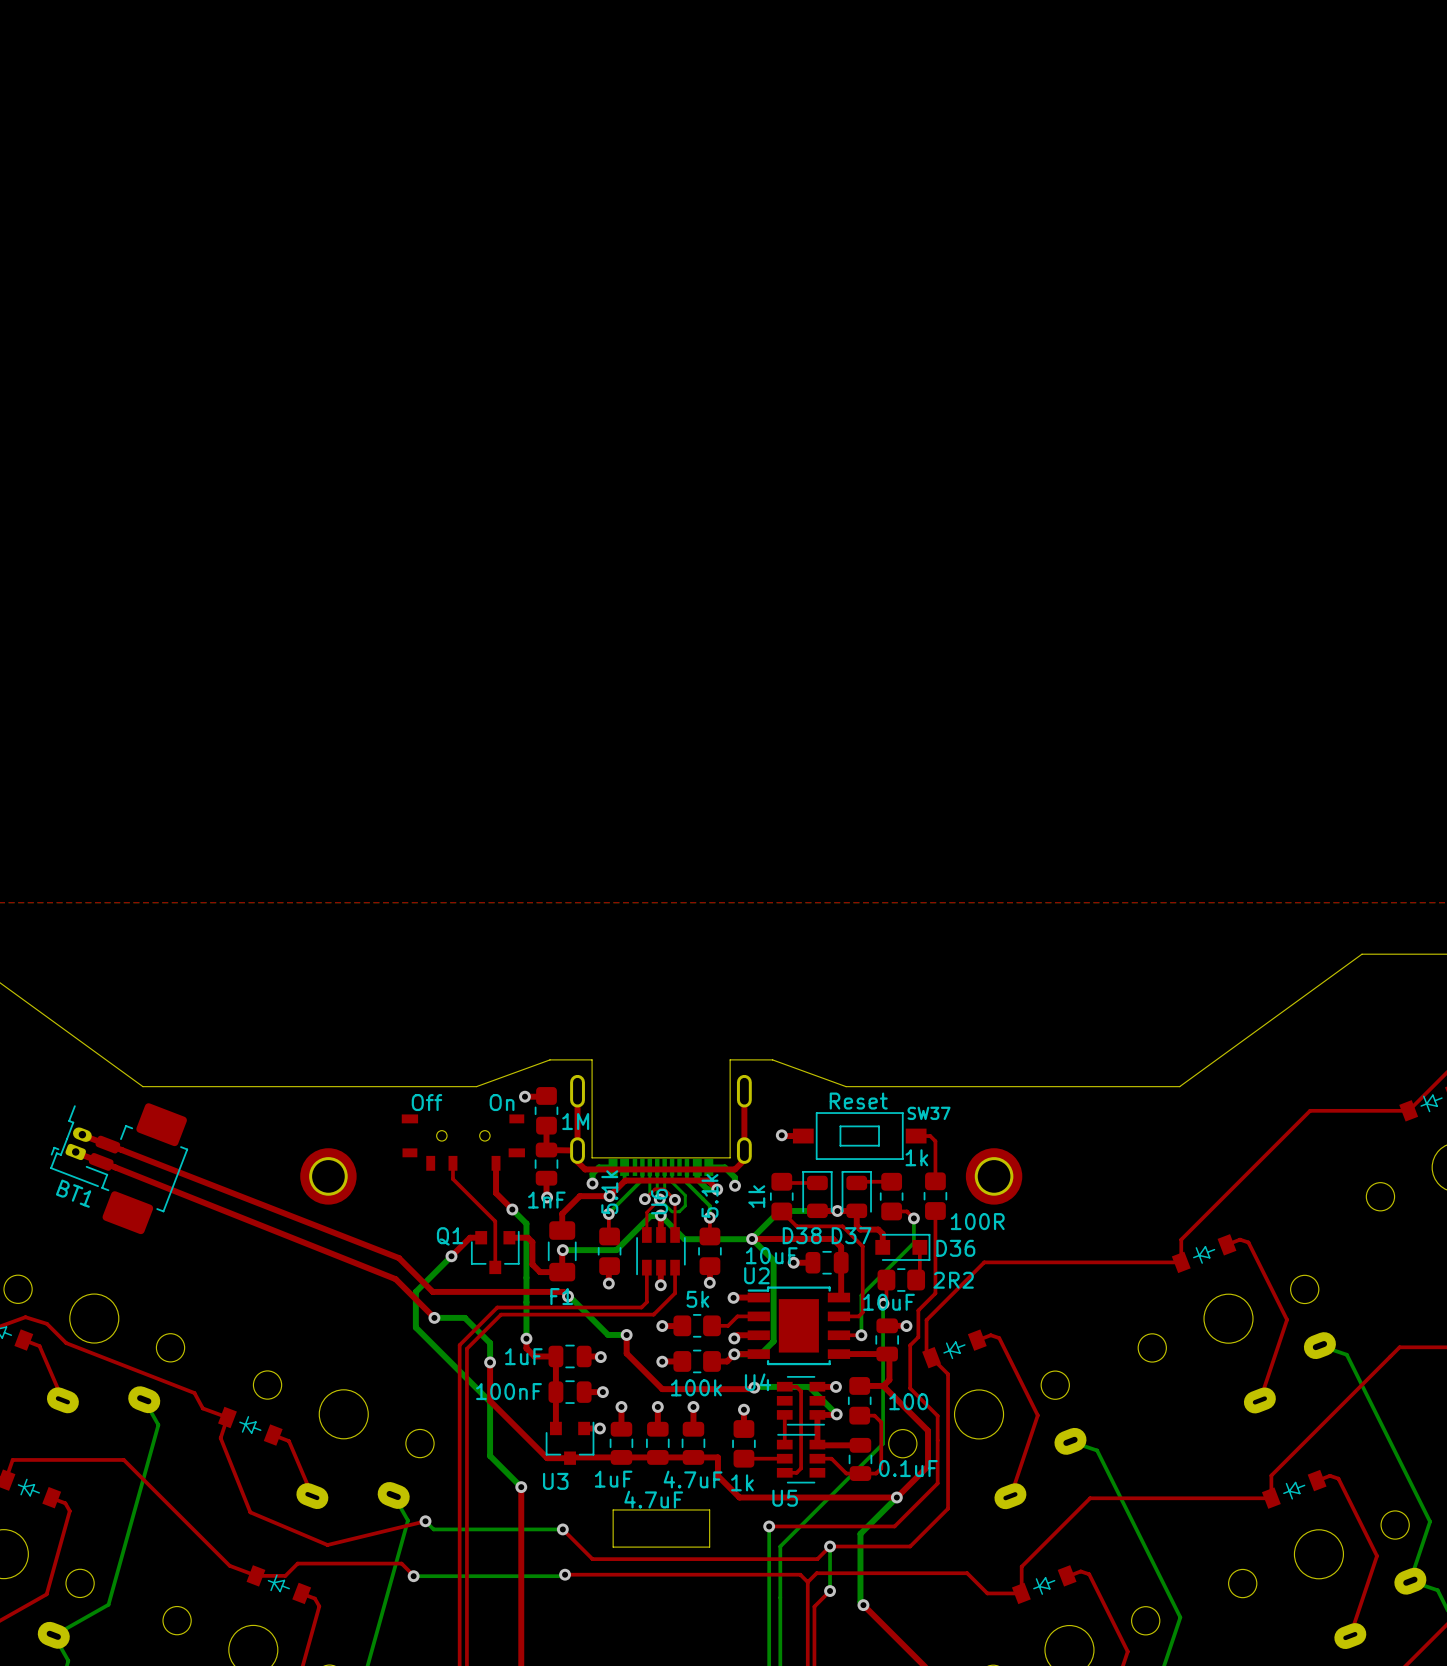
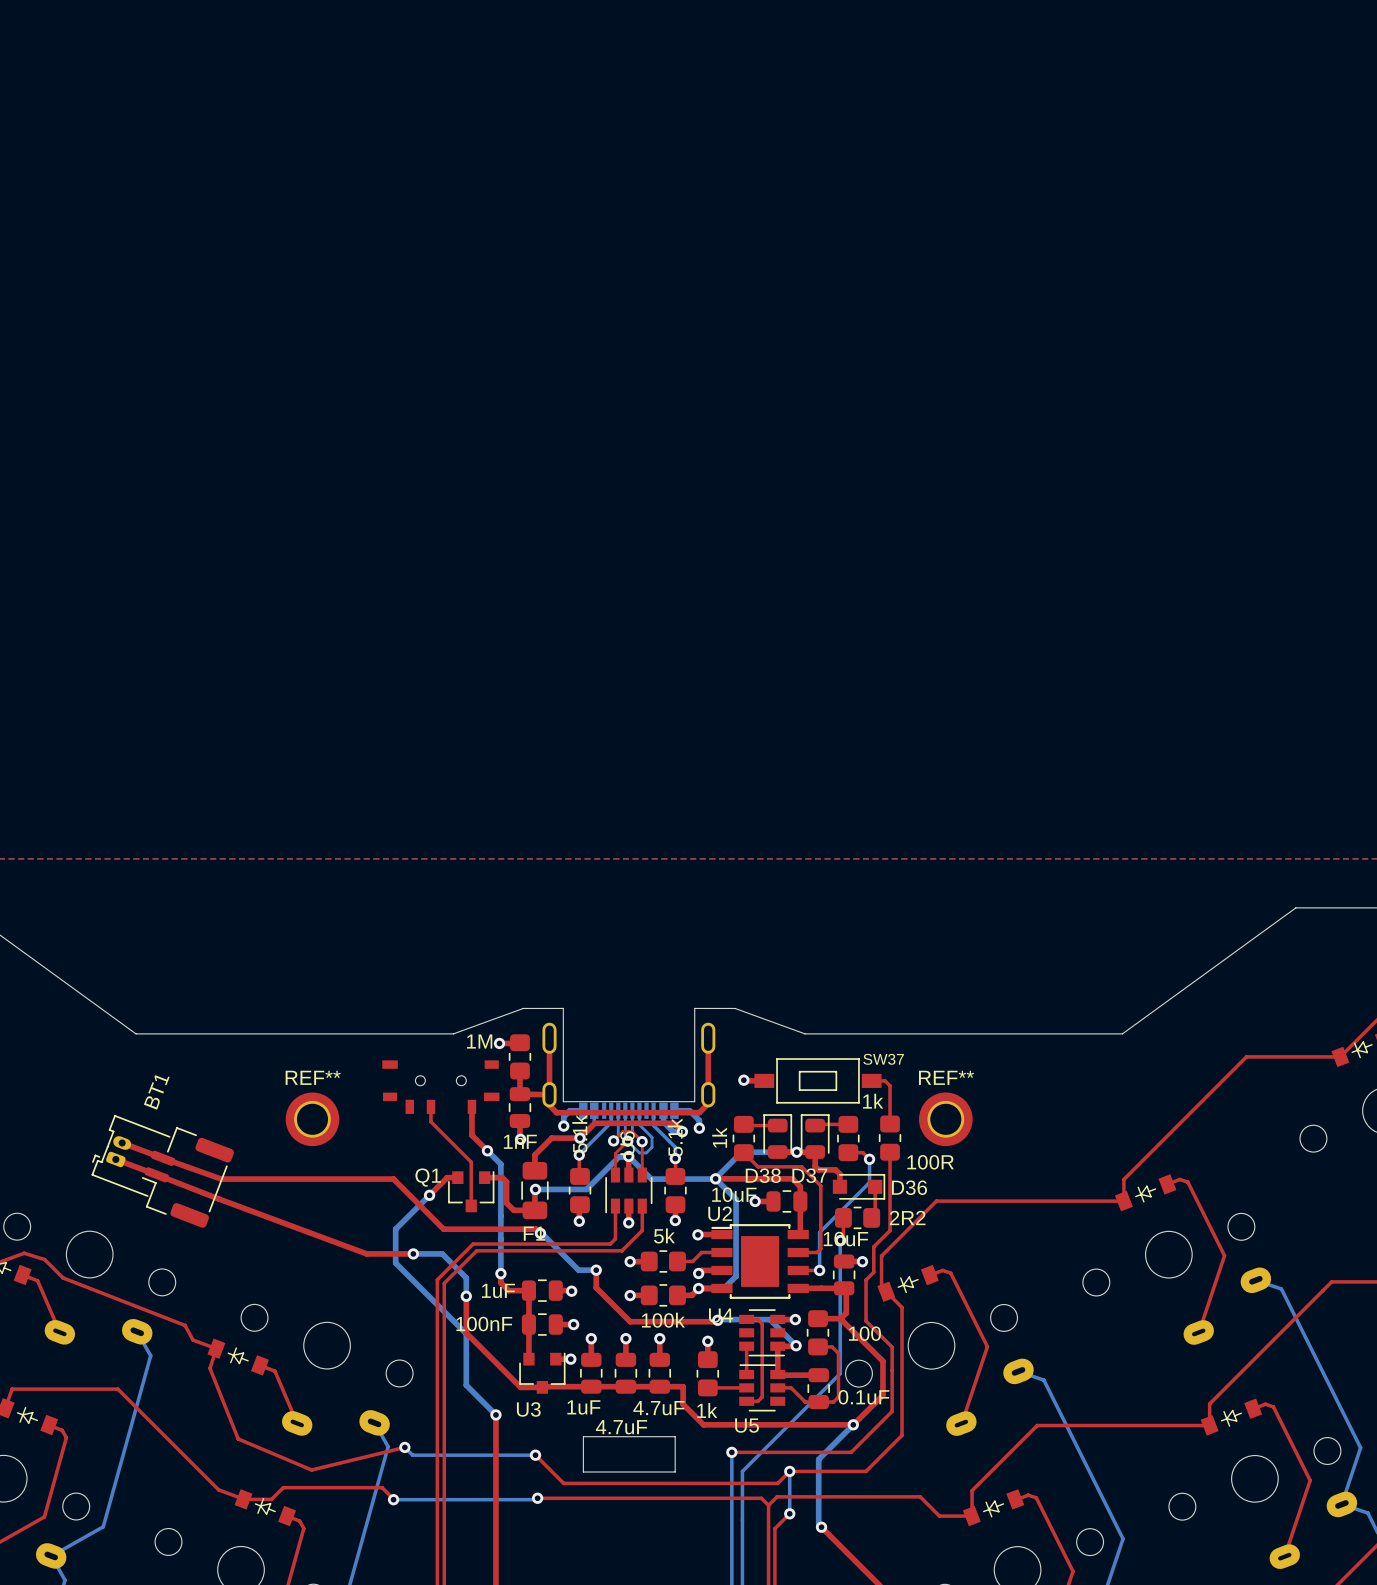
text: Reset (858, 1101) -> none
text: Off (426, 1102) -> none
text: On (502, 1102) -> none
BT1 footprint: [50, 1103, 189, 1235] -> [91, 1115, 235, 1228]
part value position: 1M (575, 1121) -> 1M (479, 1041)
REF** name: none -> REF** (313, 1077)
REF** name: none -> REF** (946, 1077)
top track: (78, 1133) (398, 1258) (432, 1291) (466, 1291) -> (122, 1142) (221, 1179) (393, 1179) (443, 1229)
top track: (72, 1151) (395, 1279) (434, 1317) -> (115, 1159) (366, 1253) (413, 1253)
BT1 name position: BT1 (73, 1193) -> BT1 (156, 1092)

